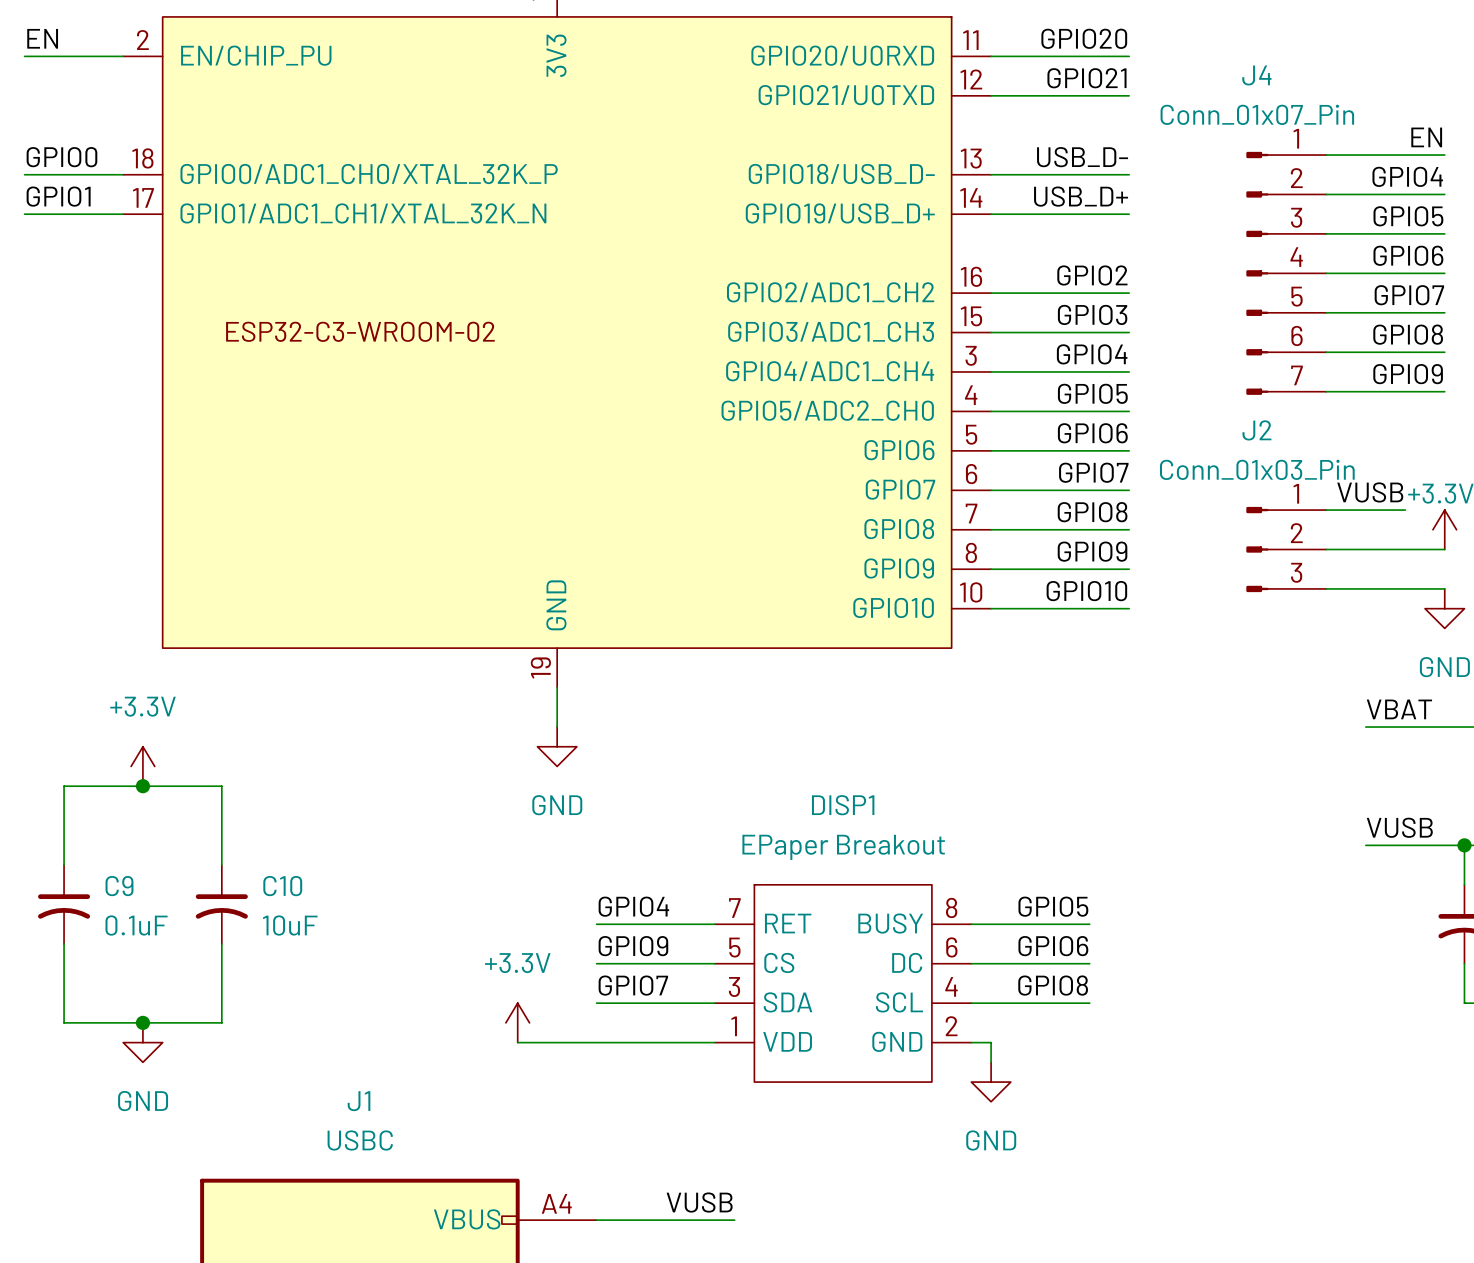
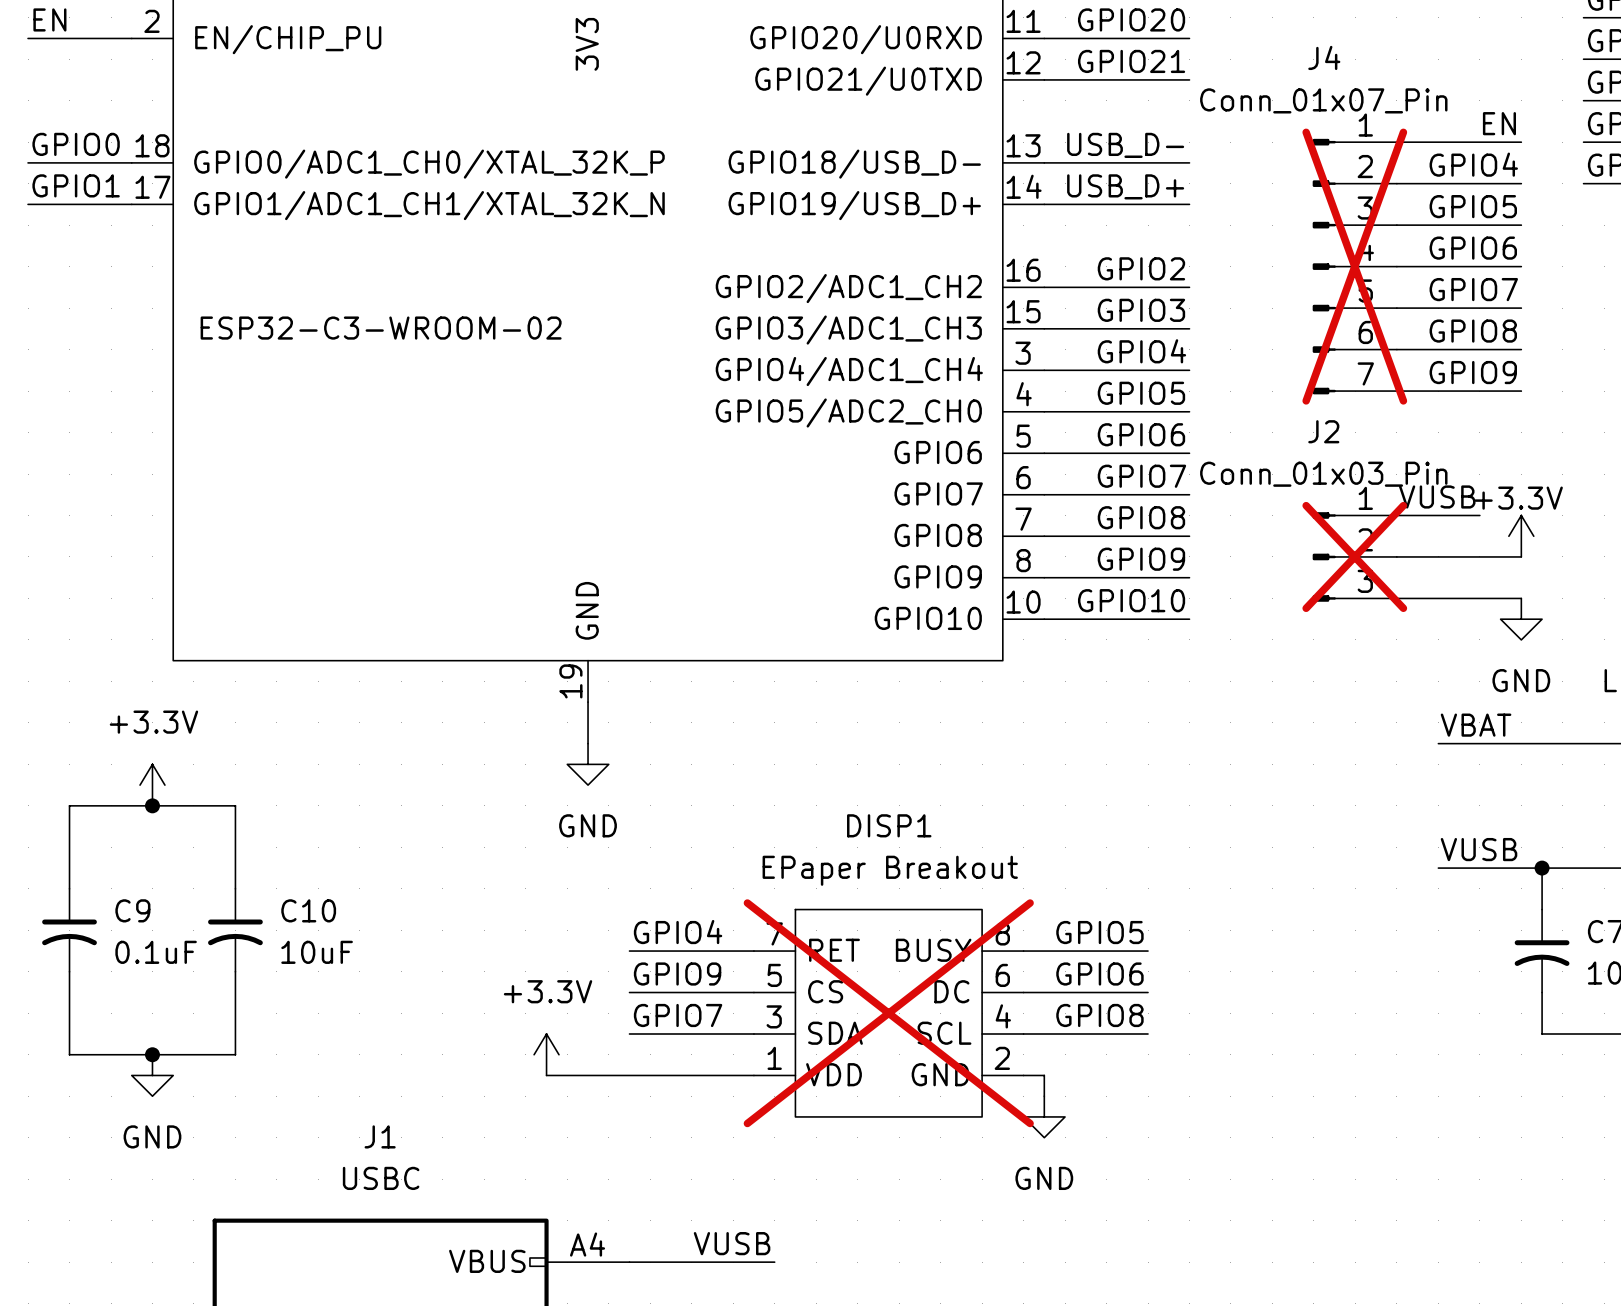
J4 do-not-place cross: none -> (1354, 266)
J2 do-not-place cross: none -> (1354, 556)
DISP1 do-not-place cross: none -> (888, 1013)

